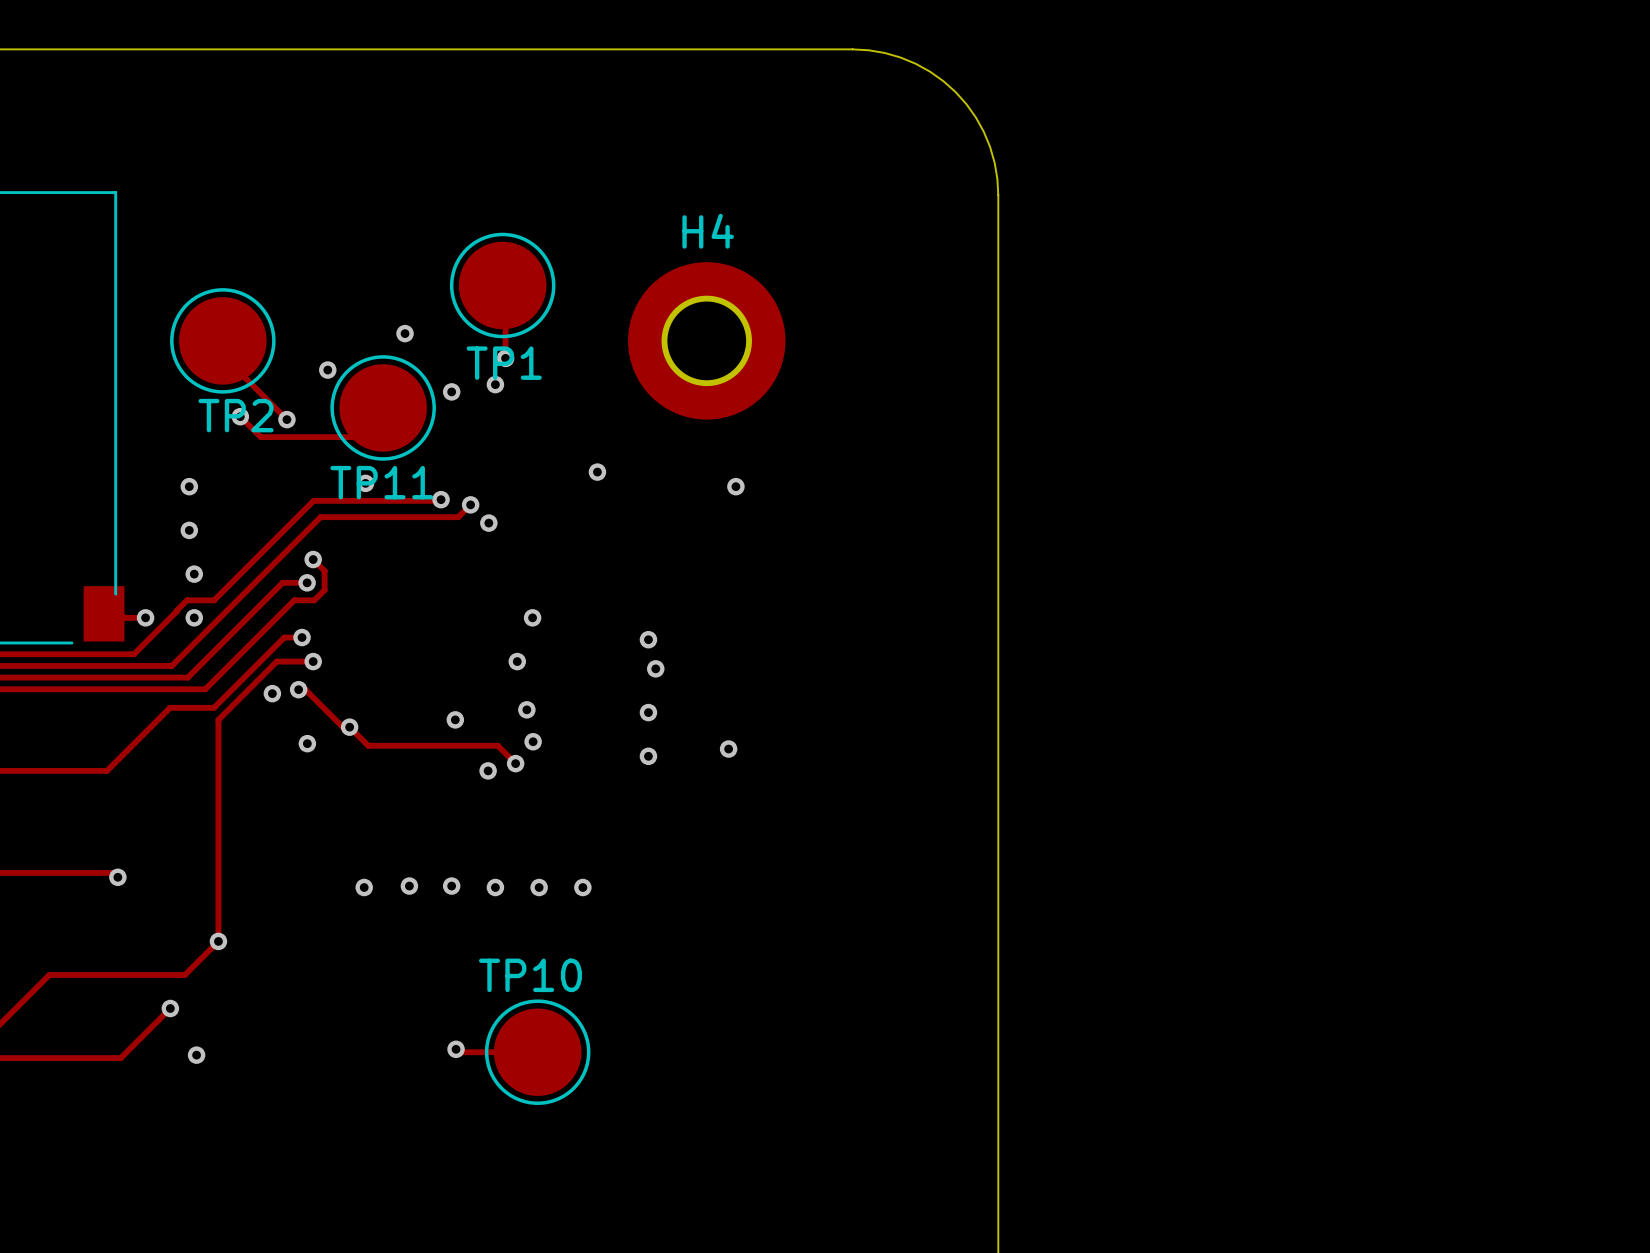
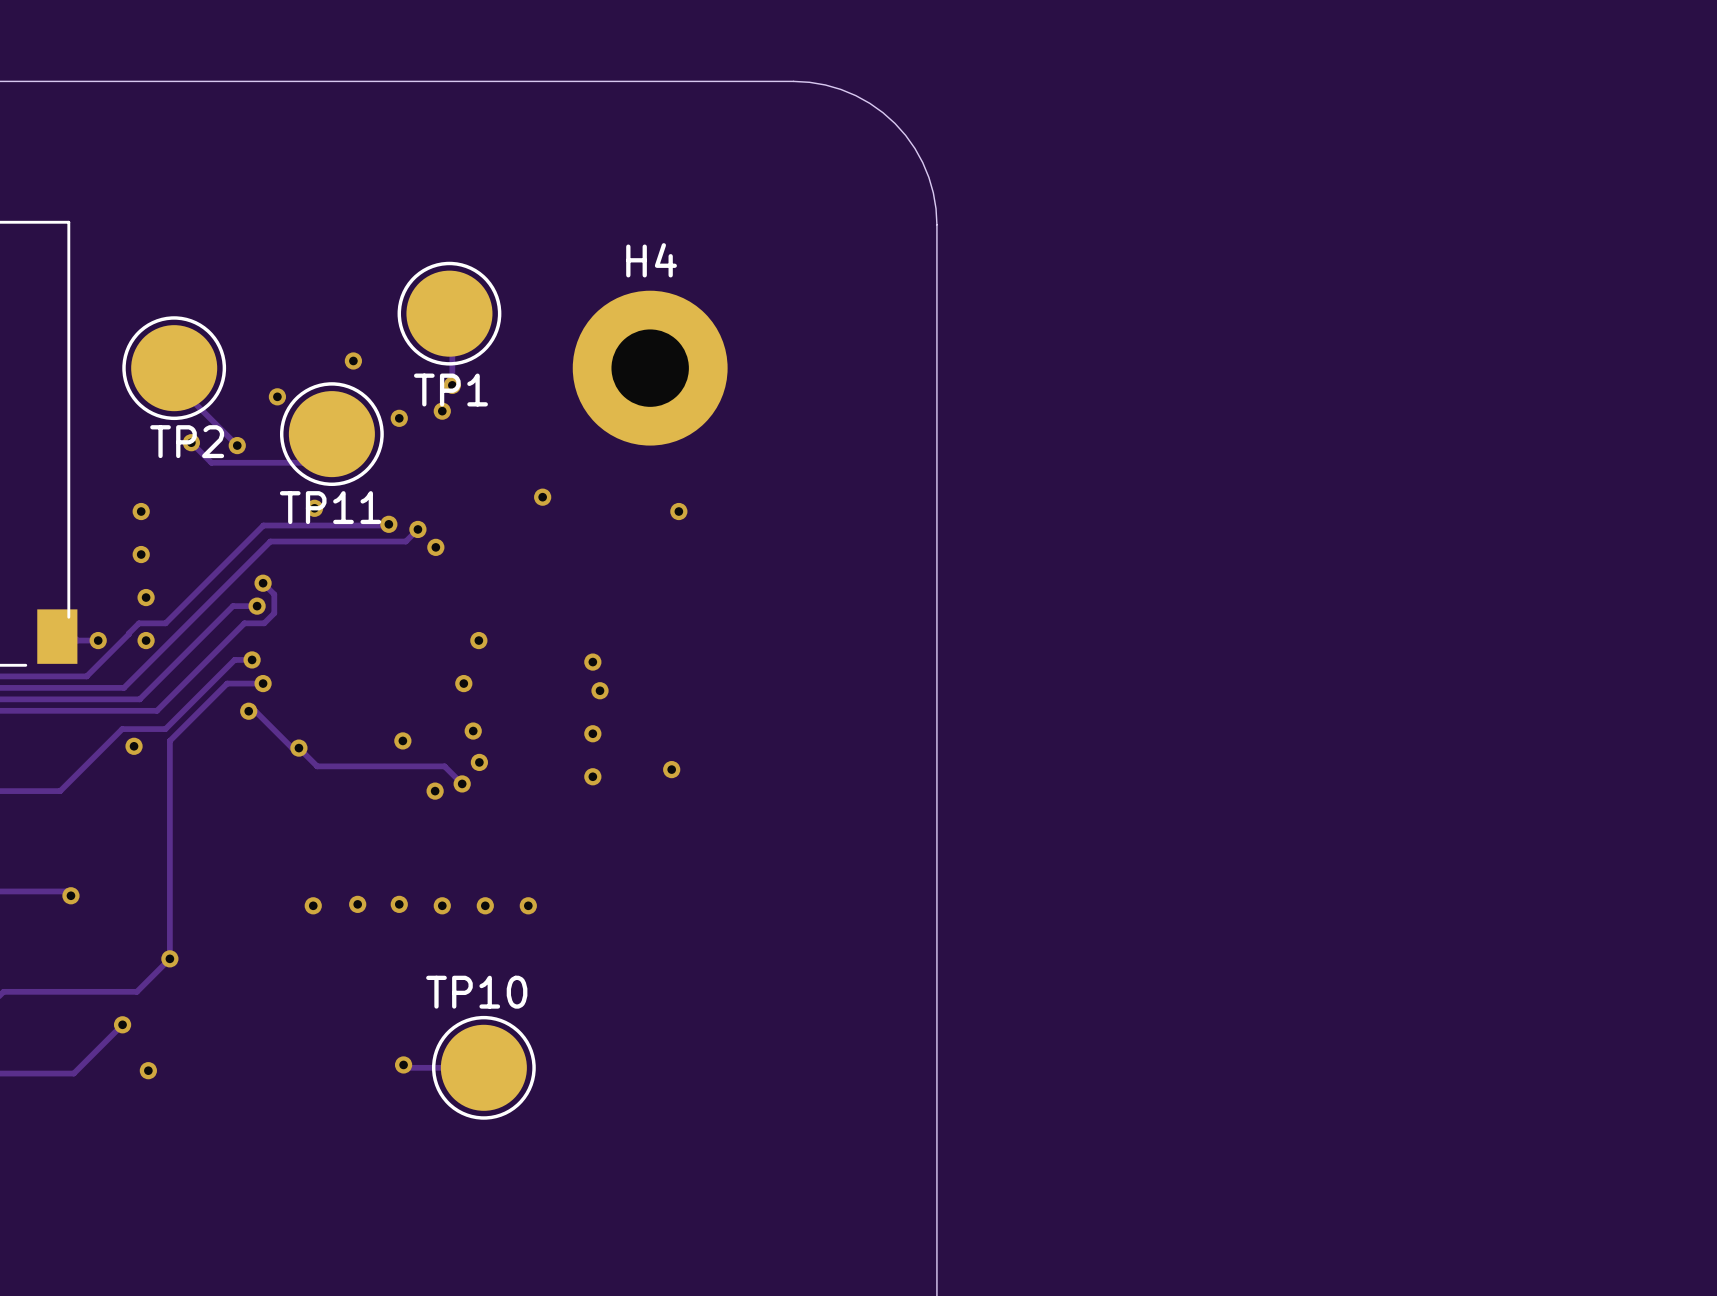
via: (272, 693) -> none
via: none -> (134, 746)
via: (307, 743) -> none

